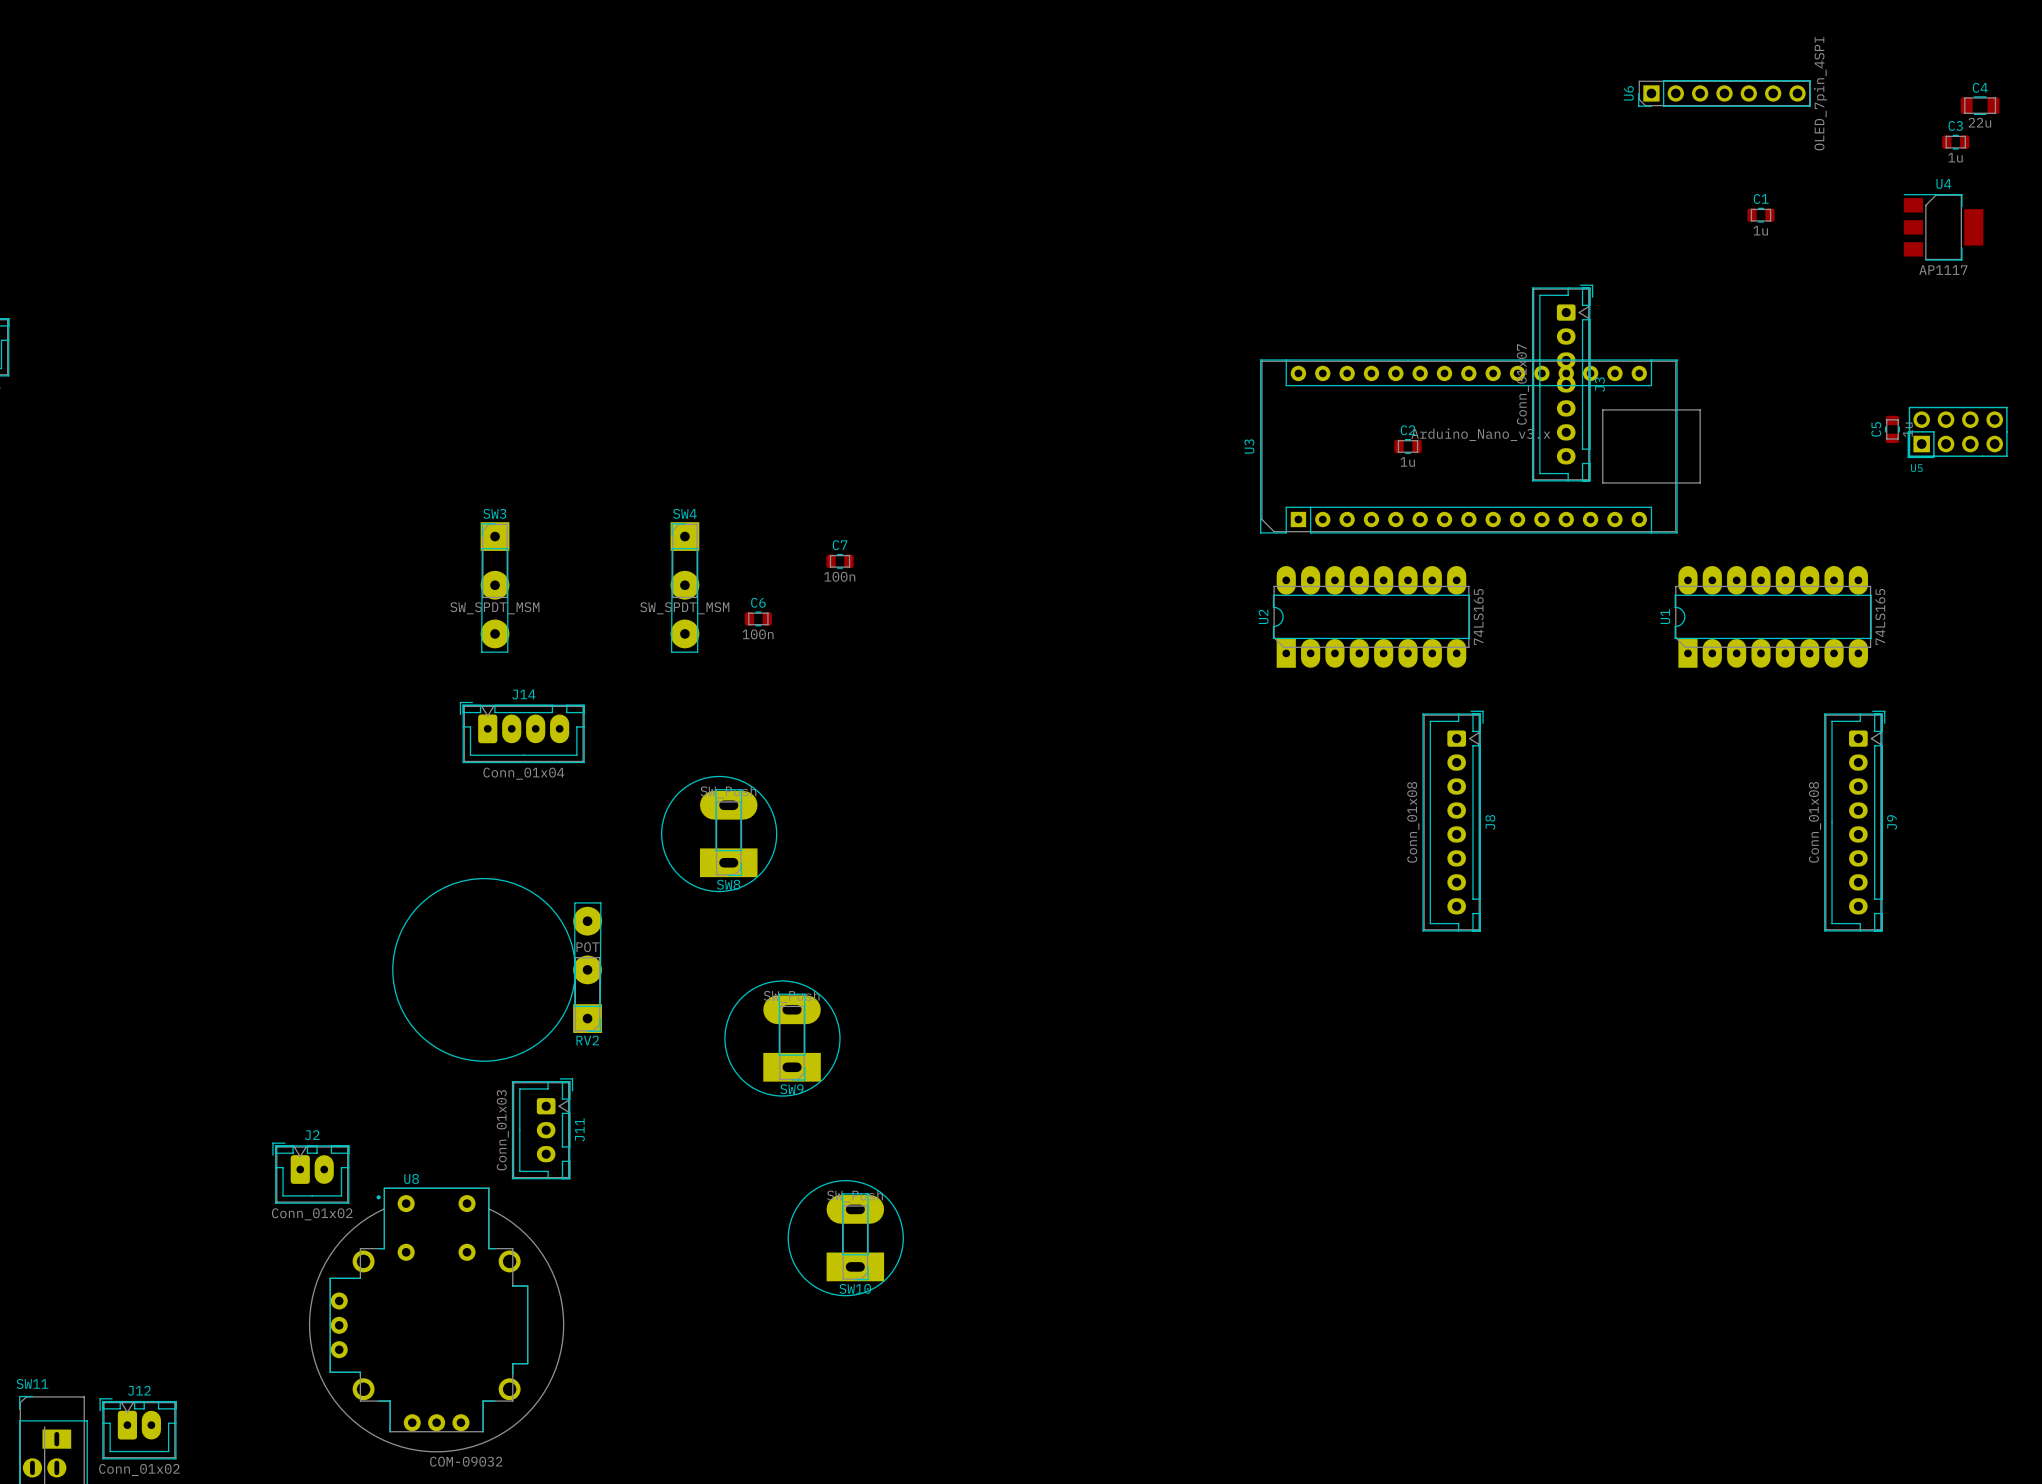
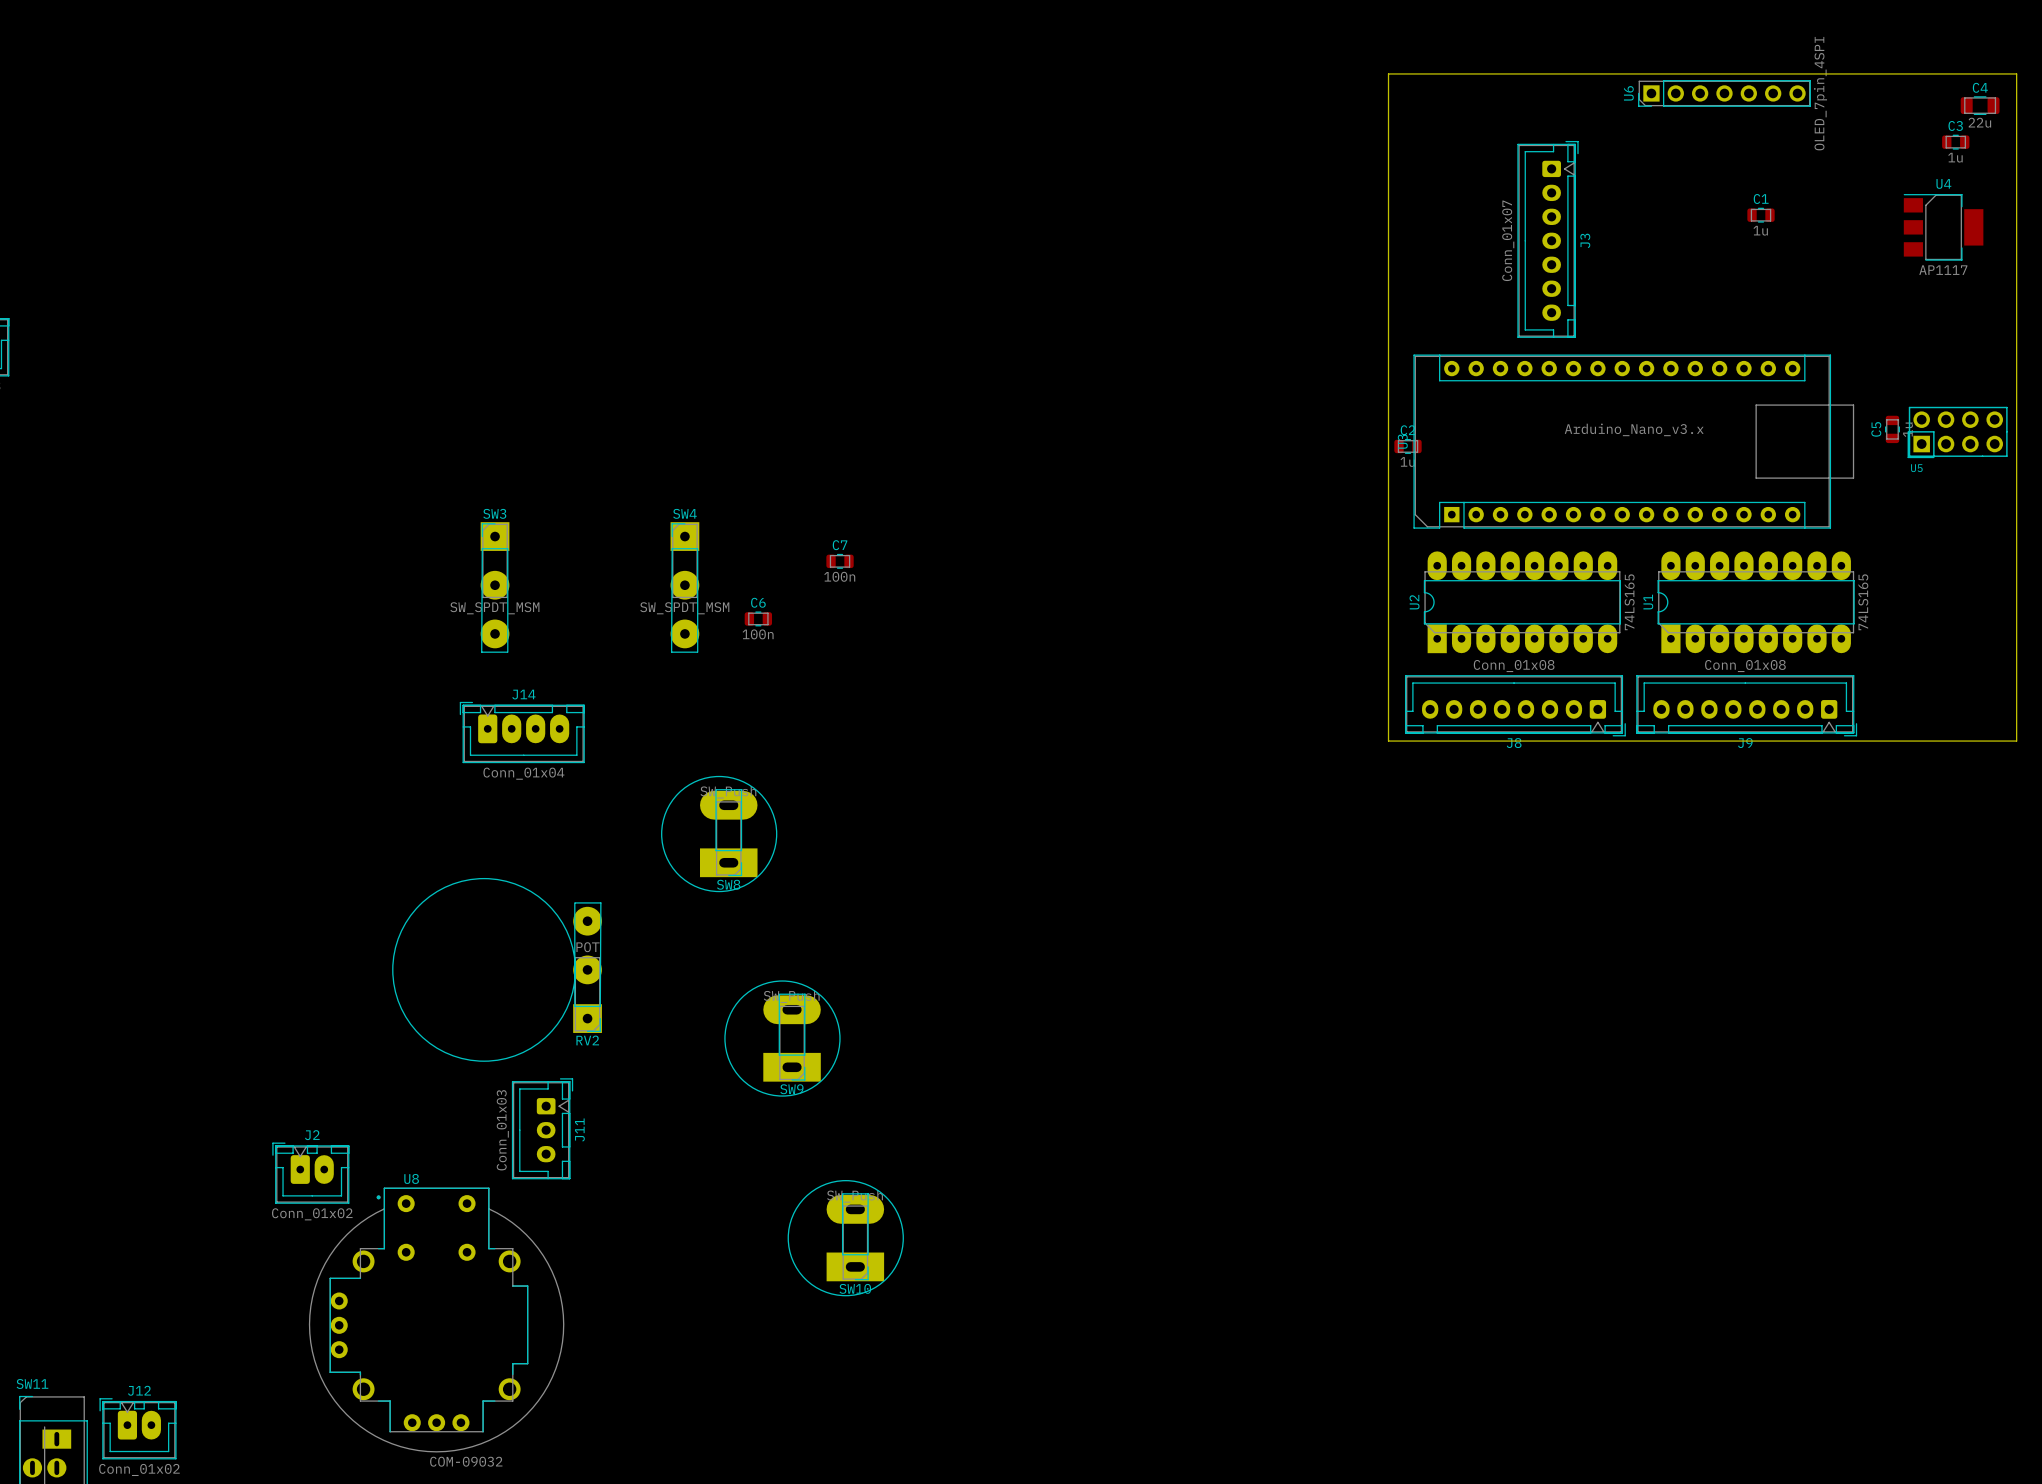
board edge: none -> (1388, 73) (2016, 73) (2016, 741) (1388, 741) (1388, 73)
J3 position: (1562, 383) -> (1547, 239)
U3 position: (1480, 446) -> (1633, 441)
U2 position: (1371, 616) -> (1522, 602)
U1 position: (1773, 616) -> (1756, 602)
J8 rotation: 0° (1453, 821) -> 90° clockwise (1515, 705)
J9 rotation: 0° (1854, 821) -> 90° clockwise (1746, 705)
J9 position: (1854, 821) -> (1746, 705)

